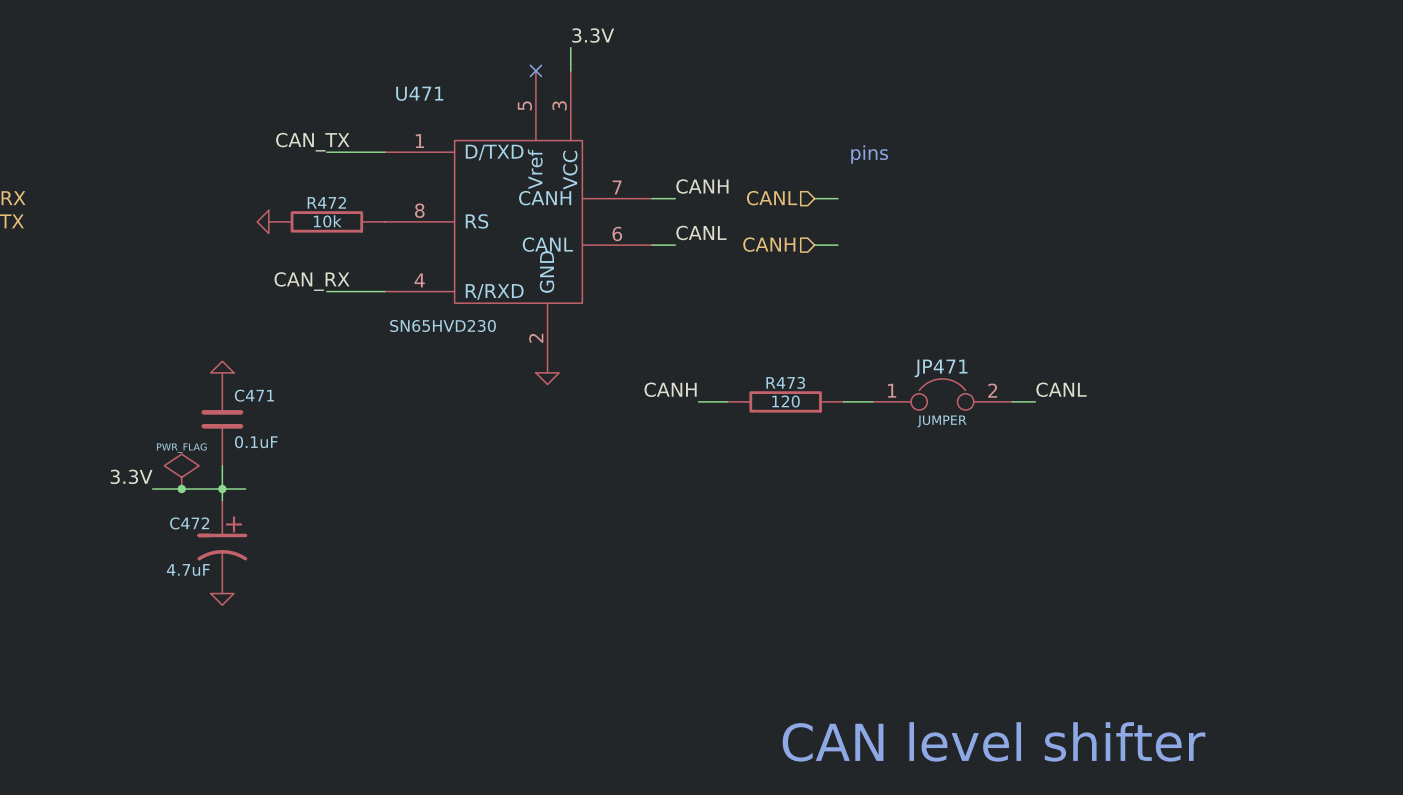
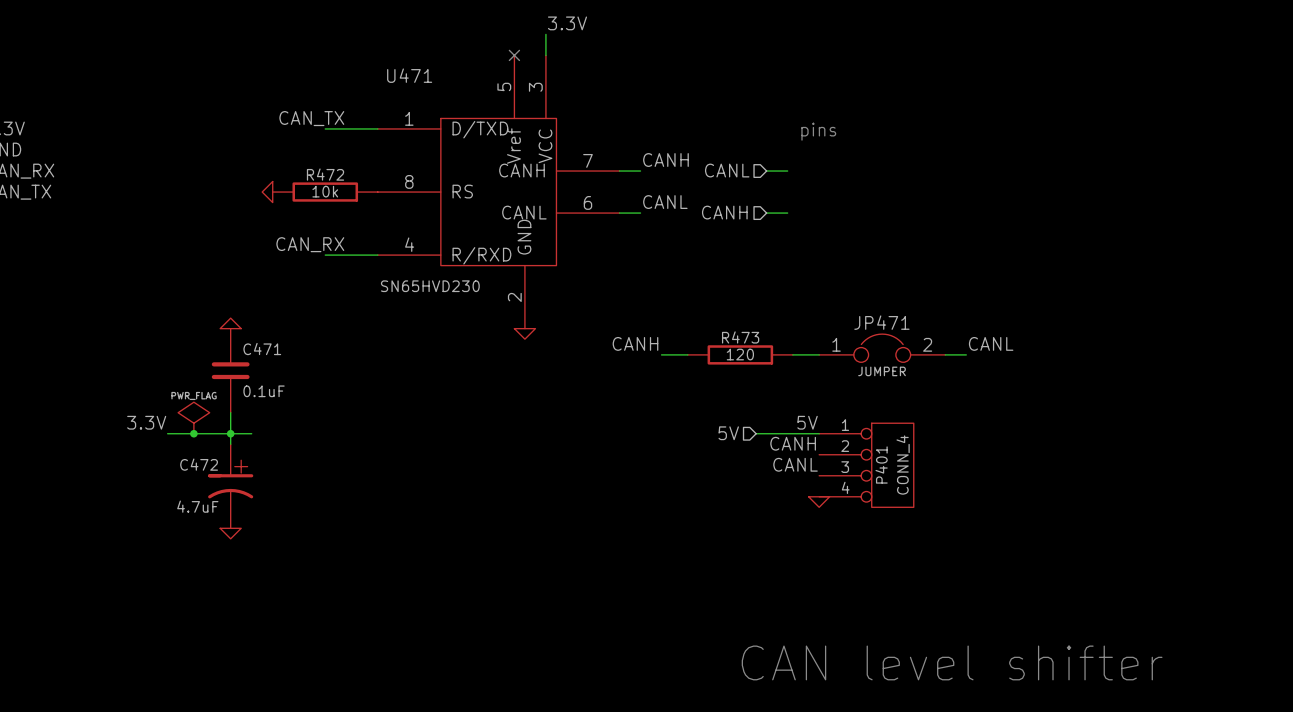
label: none -> 5V (807, 422)
hierarchical label: none -> 5V (728, 433)
wire: none -> (756, 433) (819, 433)
label: none -> CANH (793, 443)
label: none -> CANL (795, 464)
P401: none -> CONN_4 (866, 465)
power symbol: none -> (819, 502)

